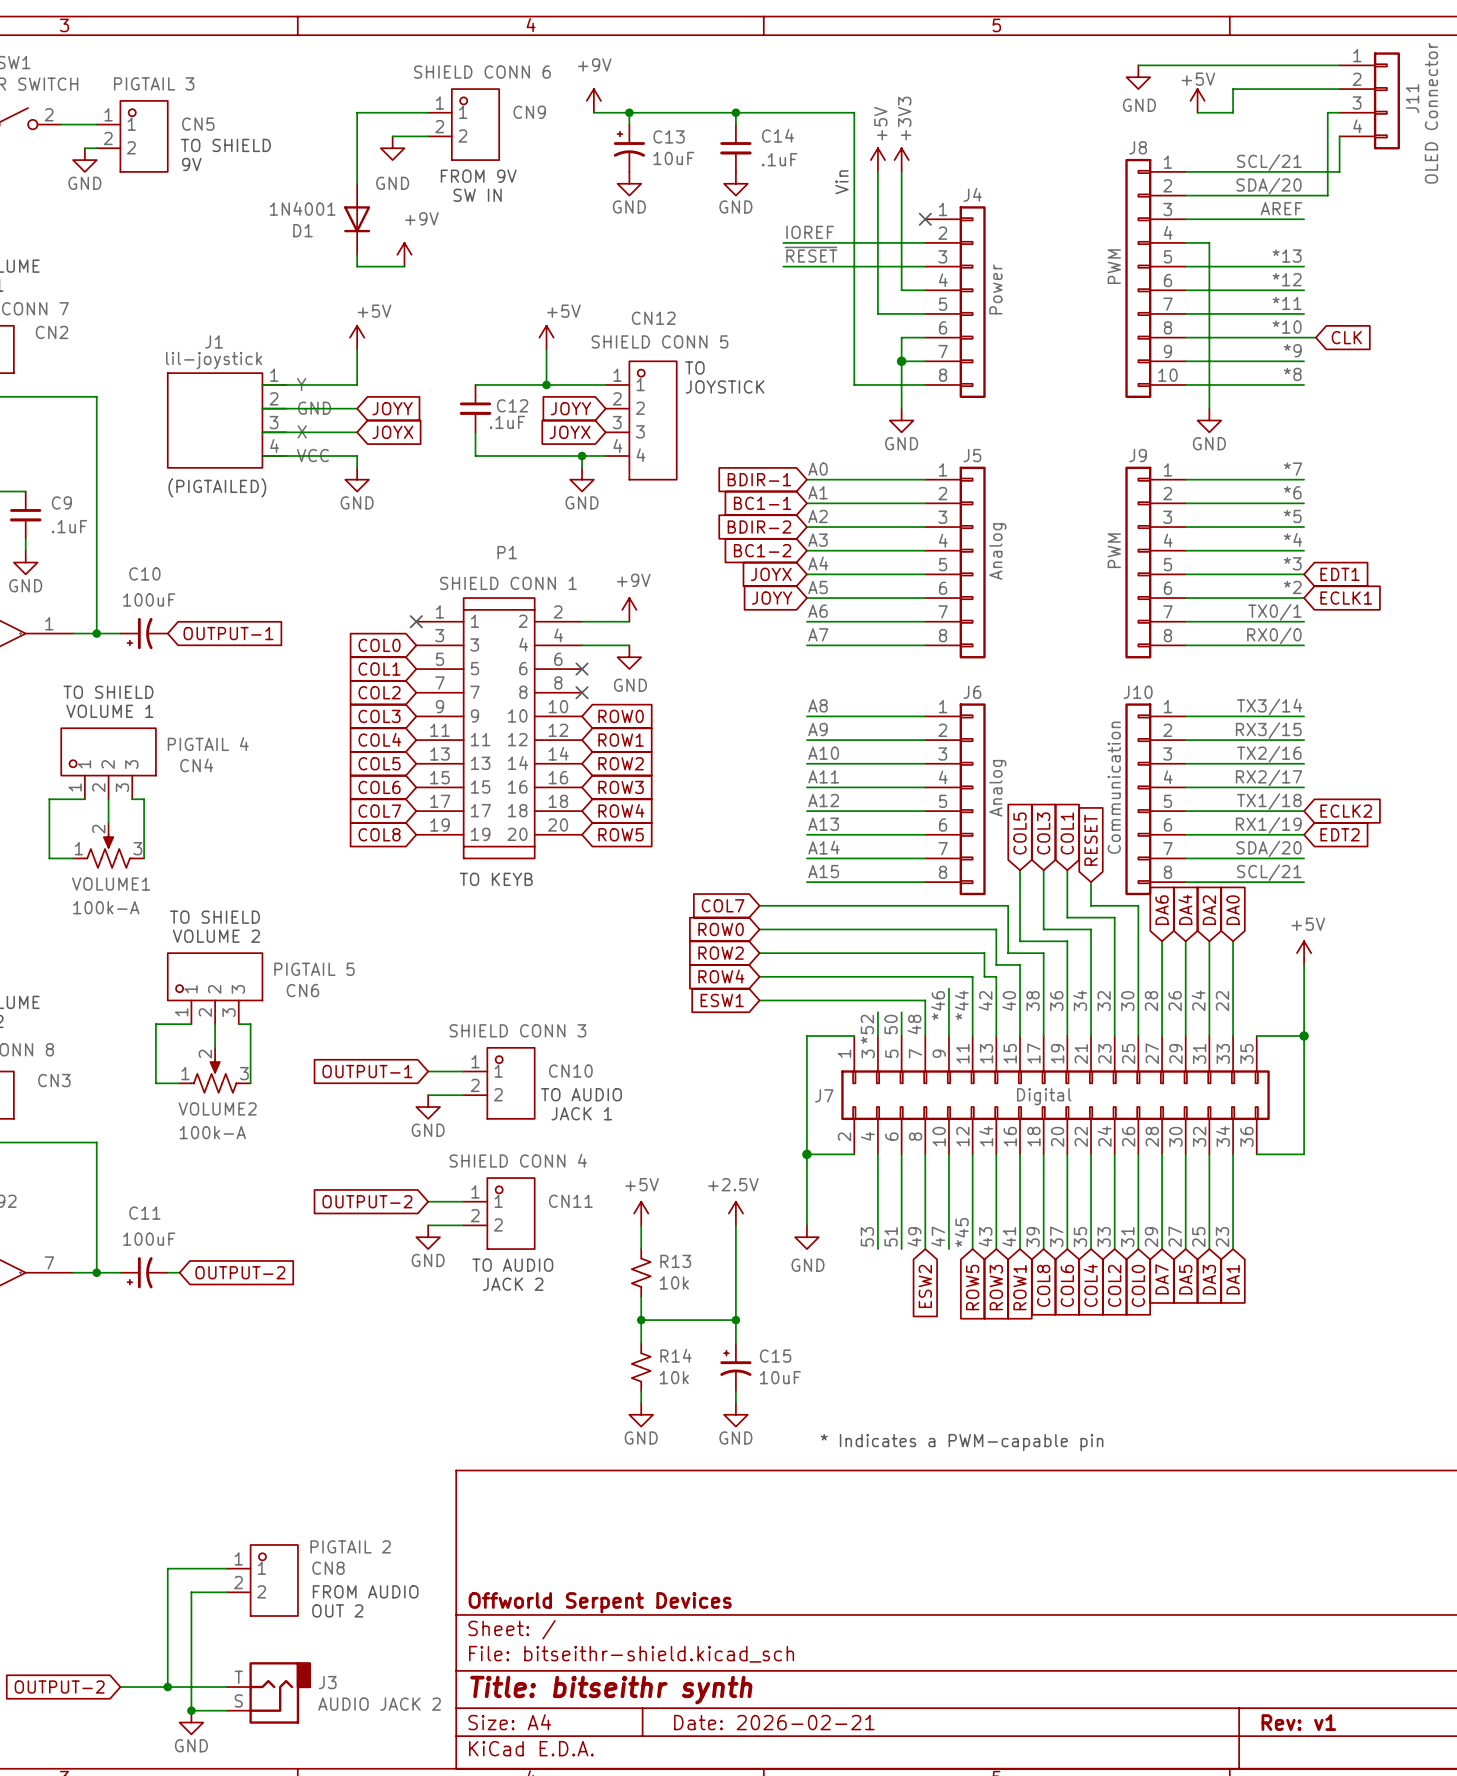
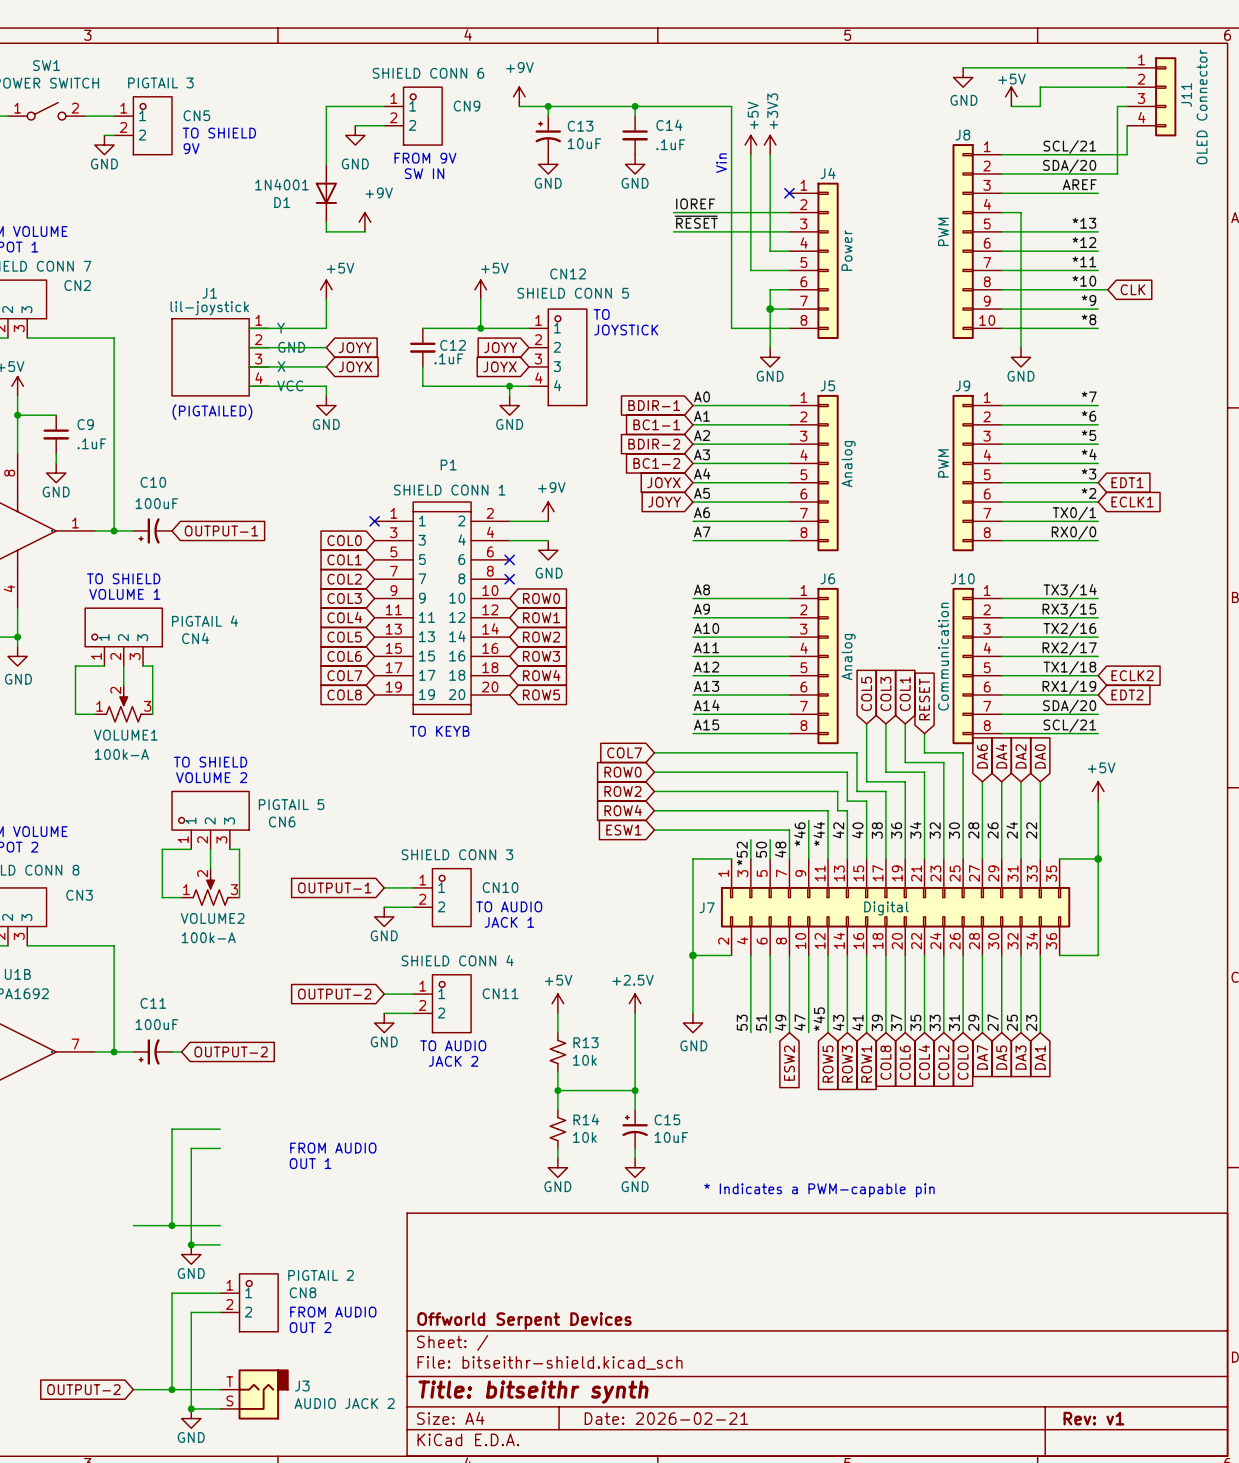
wire: none -> (220, 1129) (171, 1129) (171, 1225)
text: none -> FROM AUDIO (333, 1148)
wire: none -> (220, 1148) (191, 1148) (191, 1244) (220, 1244)
text: none -> OUT 1 (310, 1163)
wire: none -> (133, 1225) (220, 1225)
junction: none -> (171, 1225)
junction: none -> (191, 1244)
power symbol: none -> GND (191, 1254)

